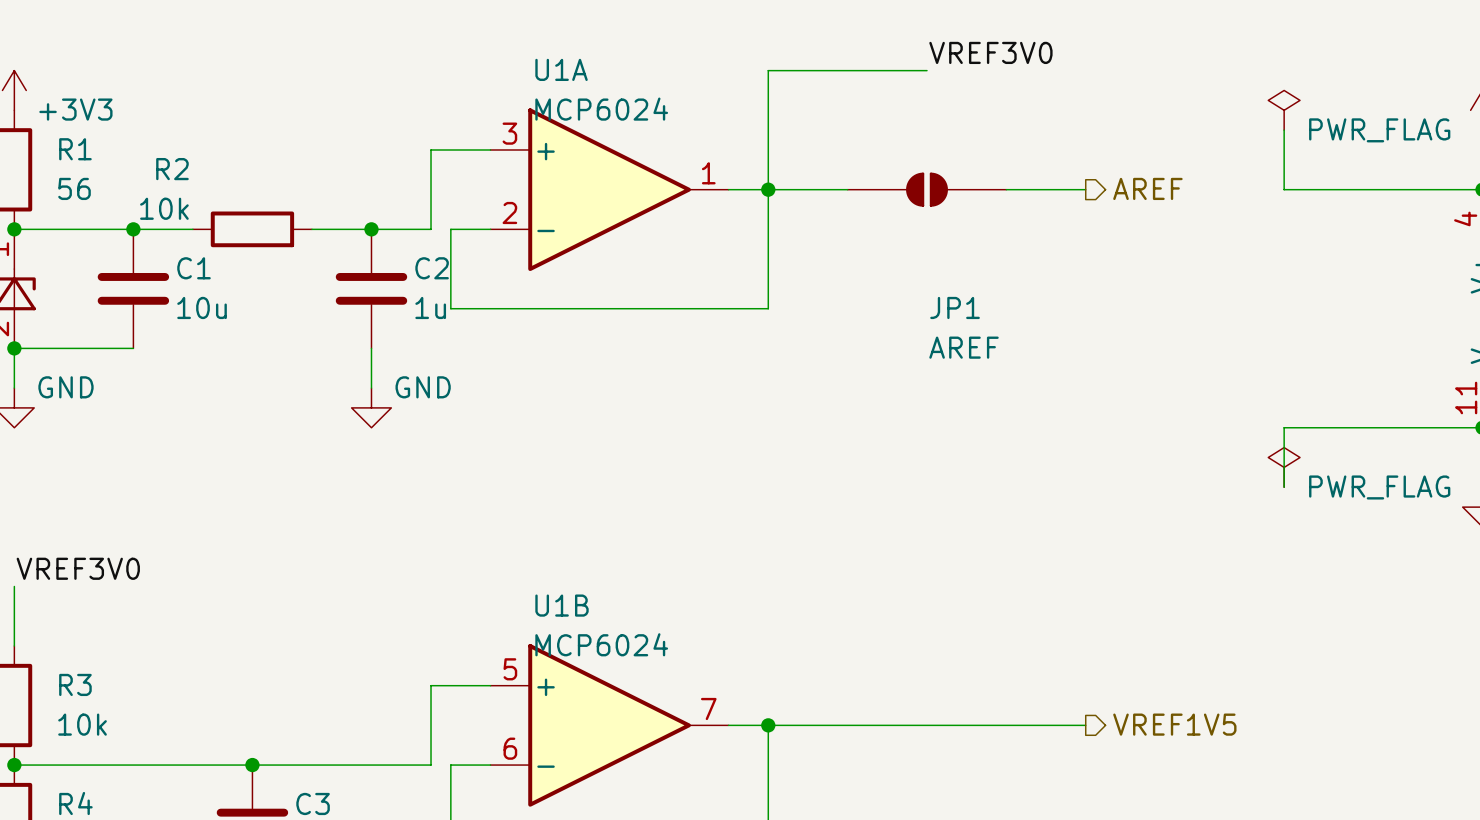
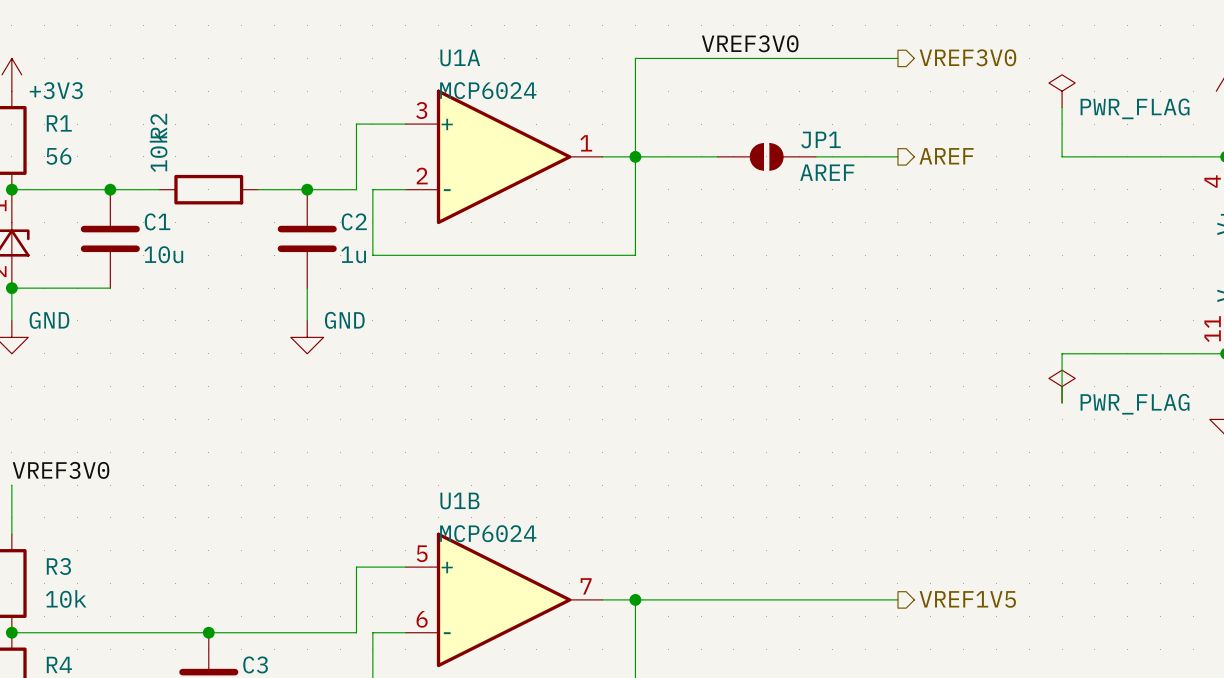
label position: VREF3V0 (990, 52) -> VREF3V0 (750, 43)
hierarchical label: none -> VREF3V0 (967, 57)
wire: none -> (766, 58) (897, 58)
R2 name rotation: 0° (172, 169) -> 90° counterclockwise (158, 126)
JP1 symbol: [847, 172, 1007, 207] -> [717, 143, 816, 171]
R2 value rotation: 0° (164, 208) -> 90° counterclockwise (158, 151)
JP1 name position: JP1 (955, 307) -> JP1 (820, 139)
JP1 value position: AREF (964, 347) -> AREF (827, 172)

